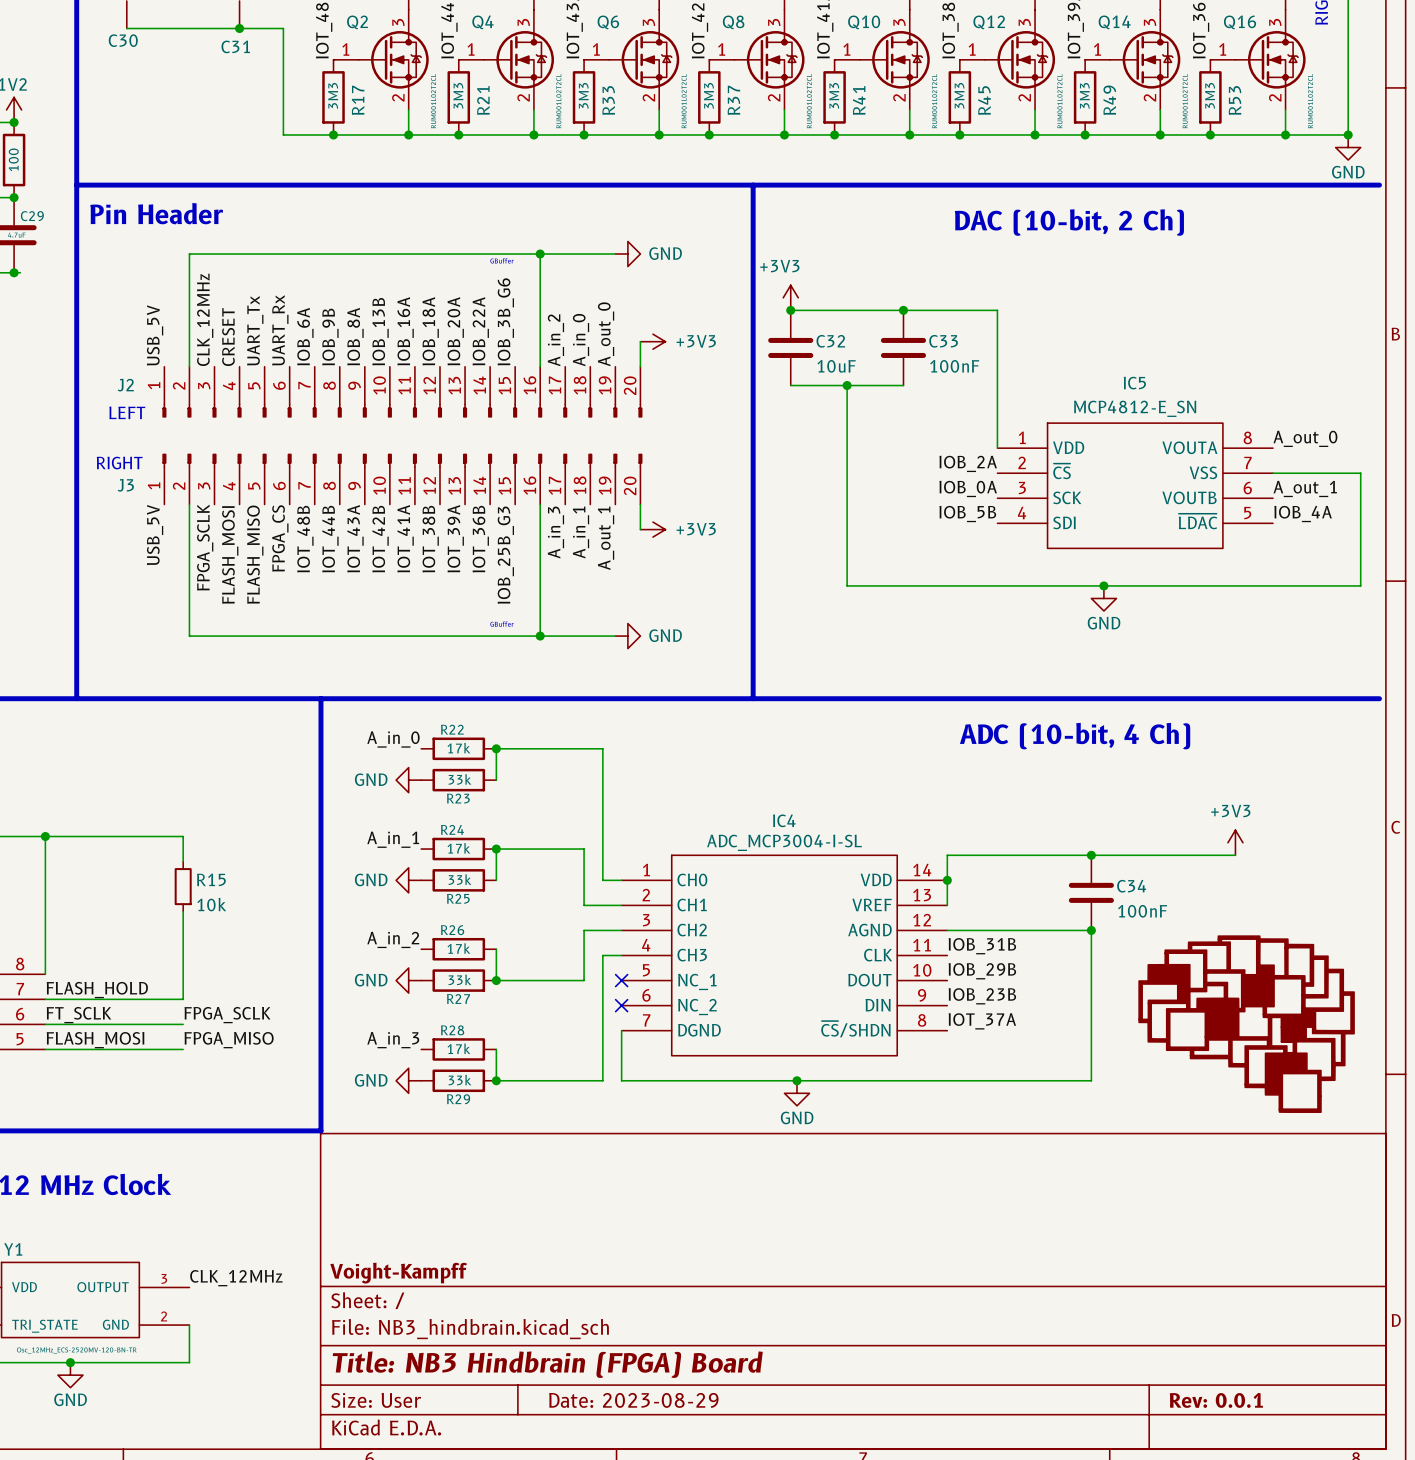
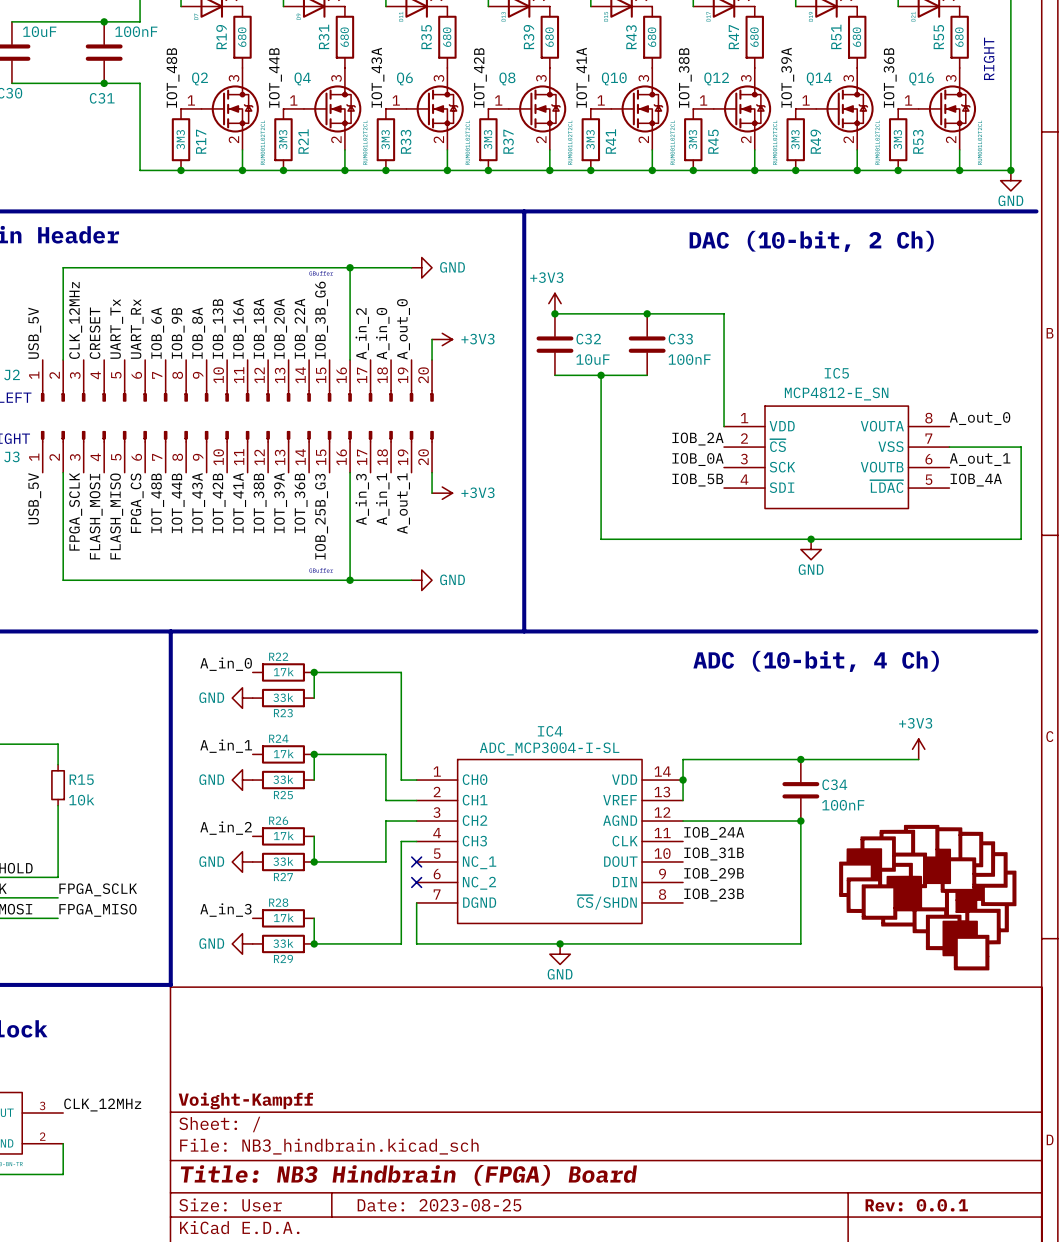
label: IOB_31B (982, 946) -> IOB_24A (714, 833)
label: IOB_29B (982, 971) -> IOB_31B (714, 854)
label: IOB_23B (982, 996) -> IOB_29B (714, 874)
label: IOT_37A (982, 1021) -> IOB_23B (714, 894)
title block: Date: 2023-08-29 (633, 1400) -> Date: 2023-08-25 (439, 1205)

